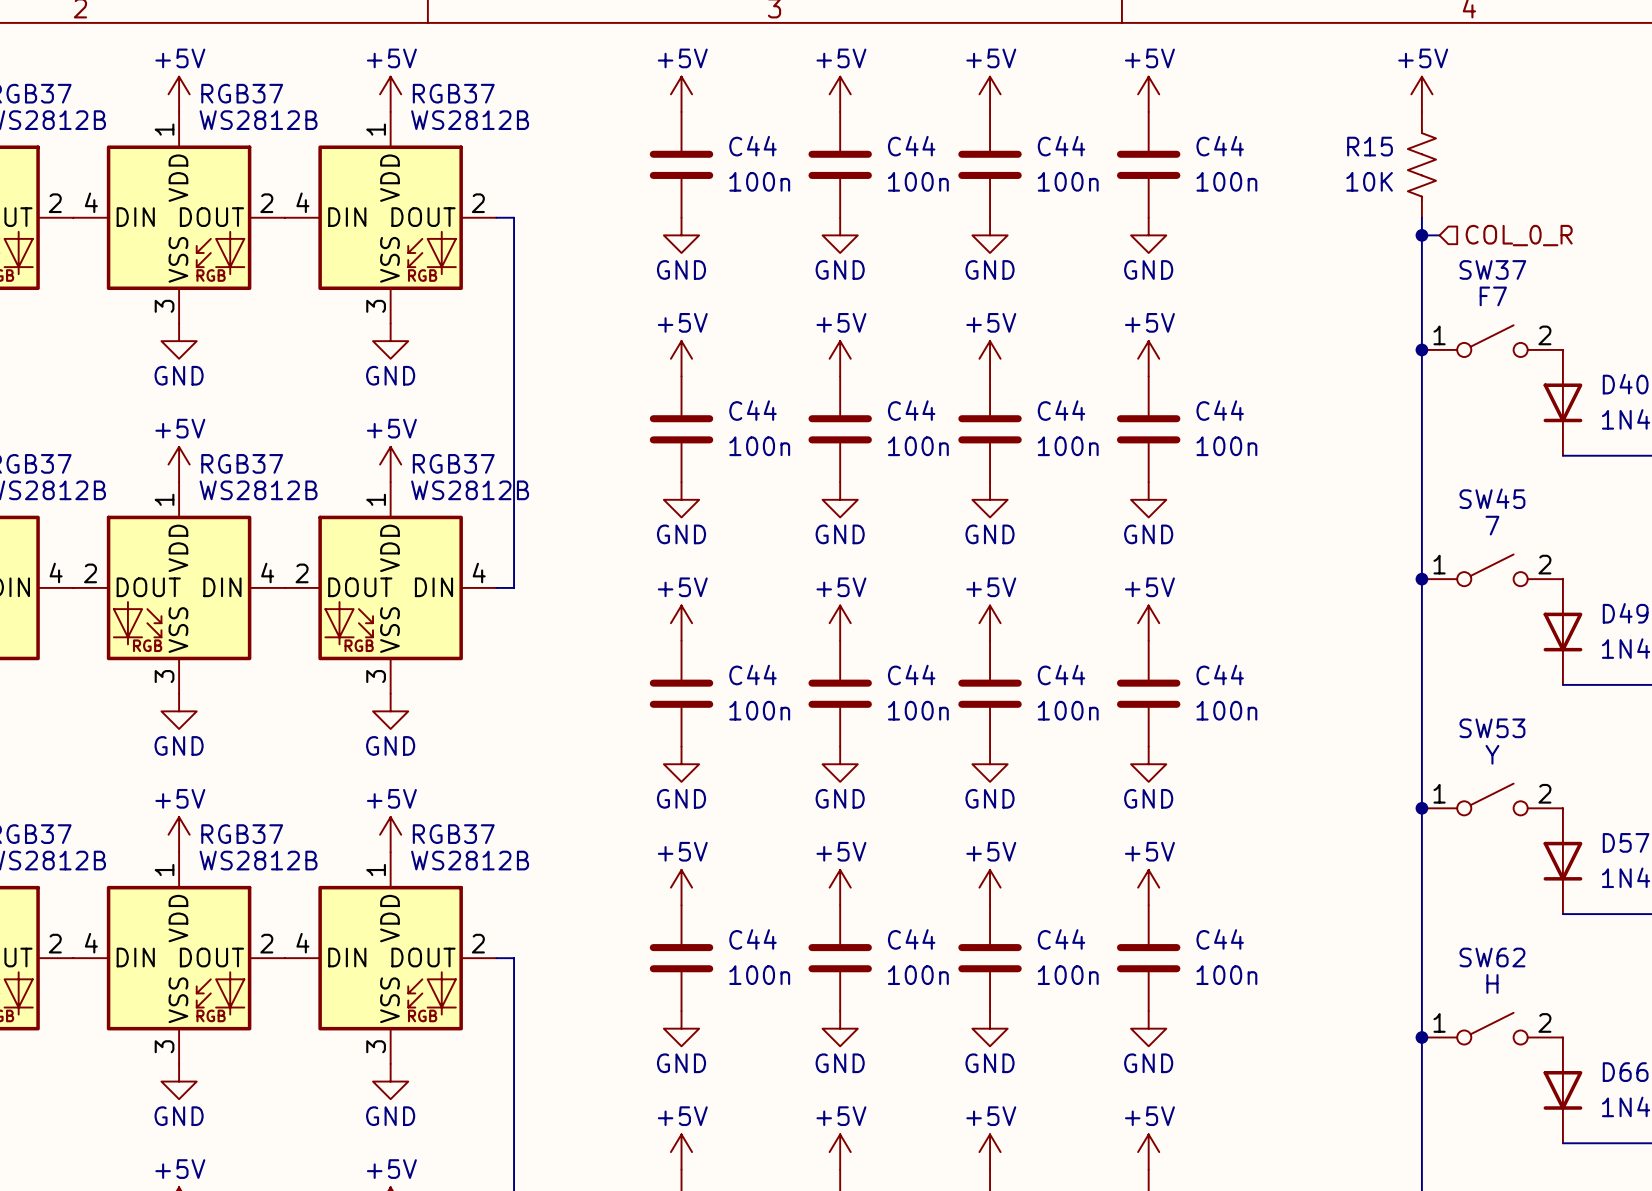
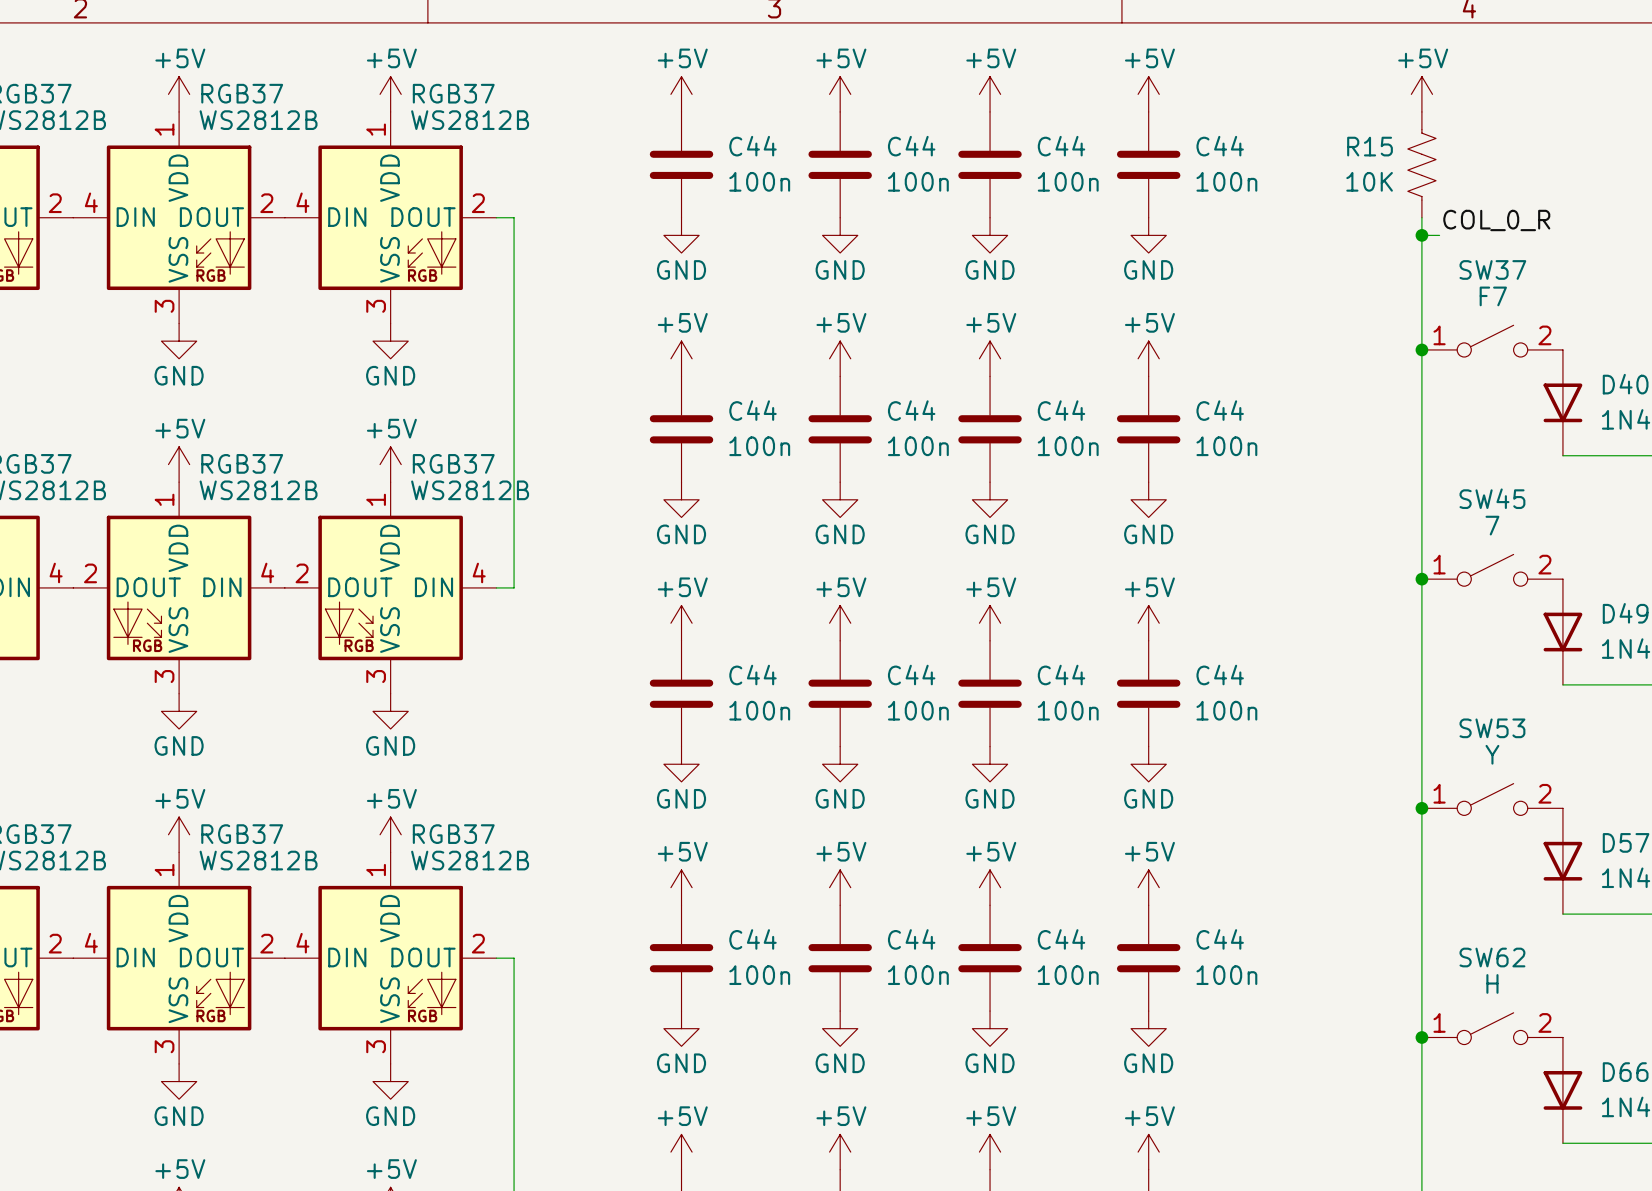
label: none -> COL_0_R (1496, 220)
hierarchical label: COL_0_R (1519, 235) -> none

